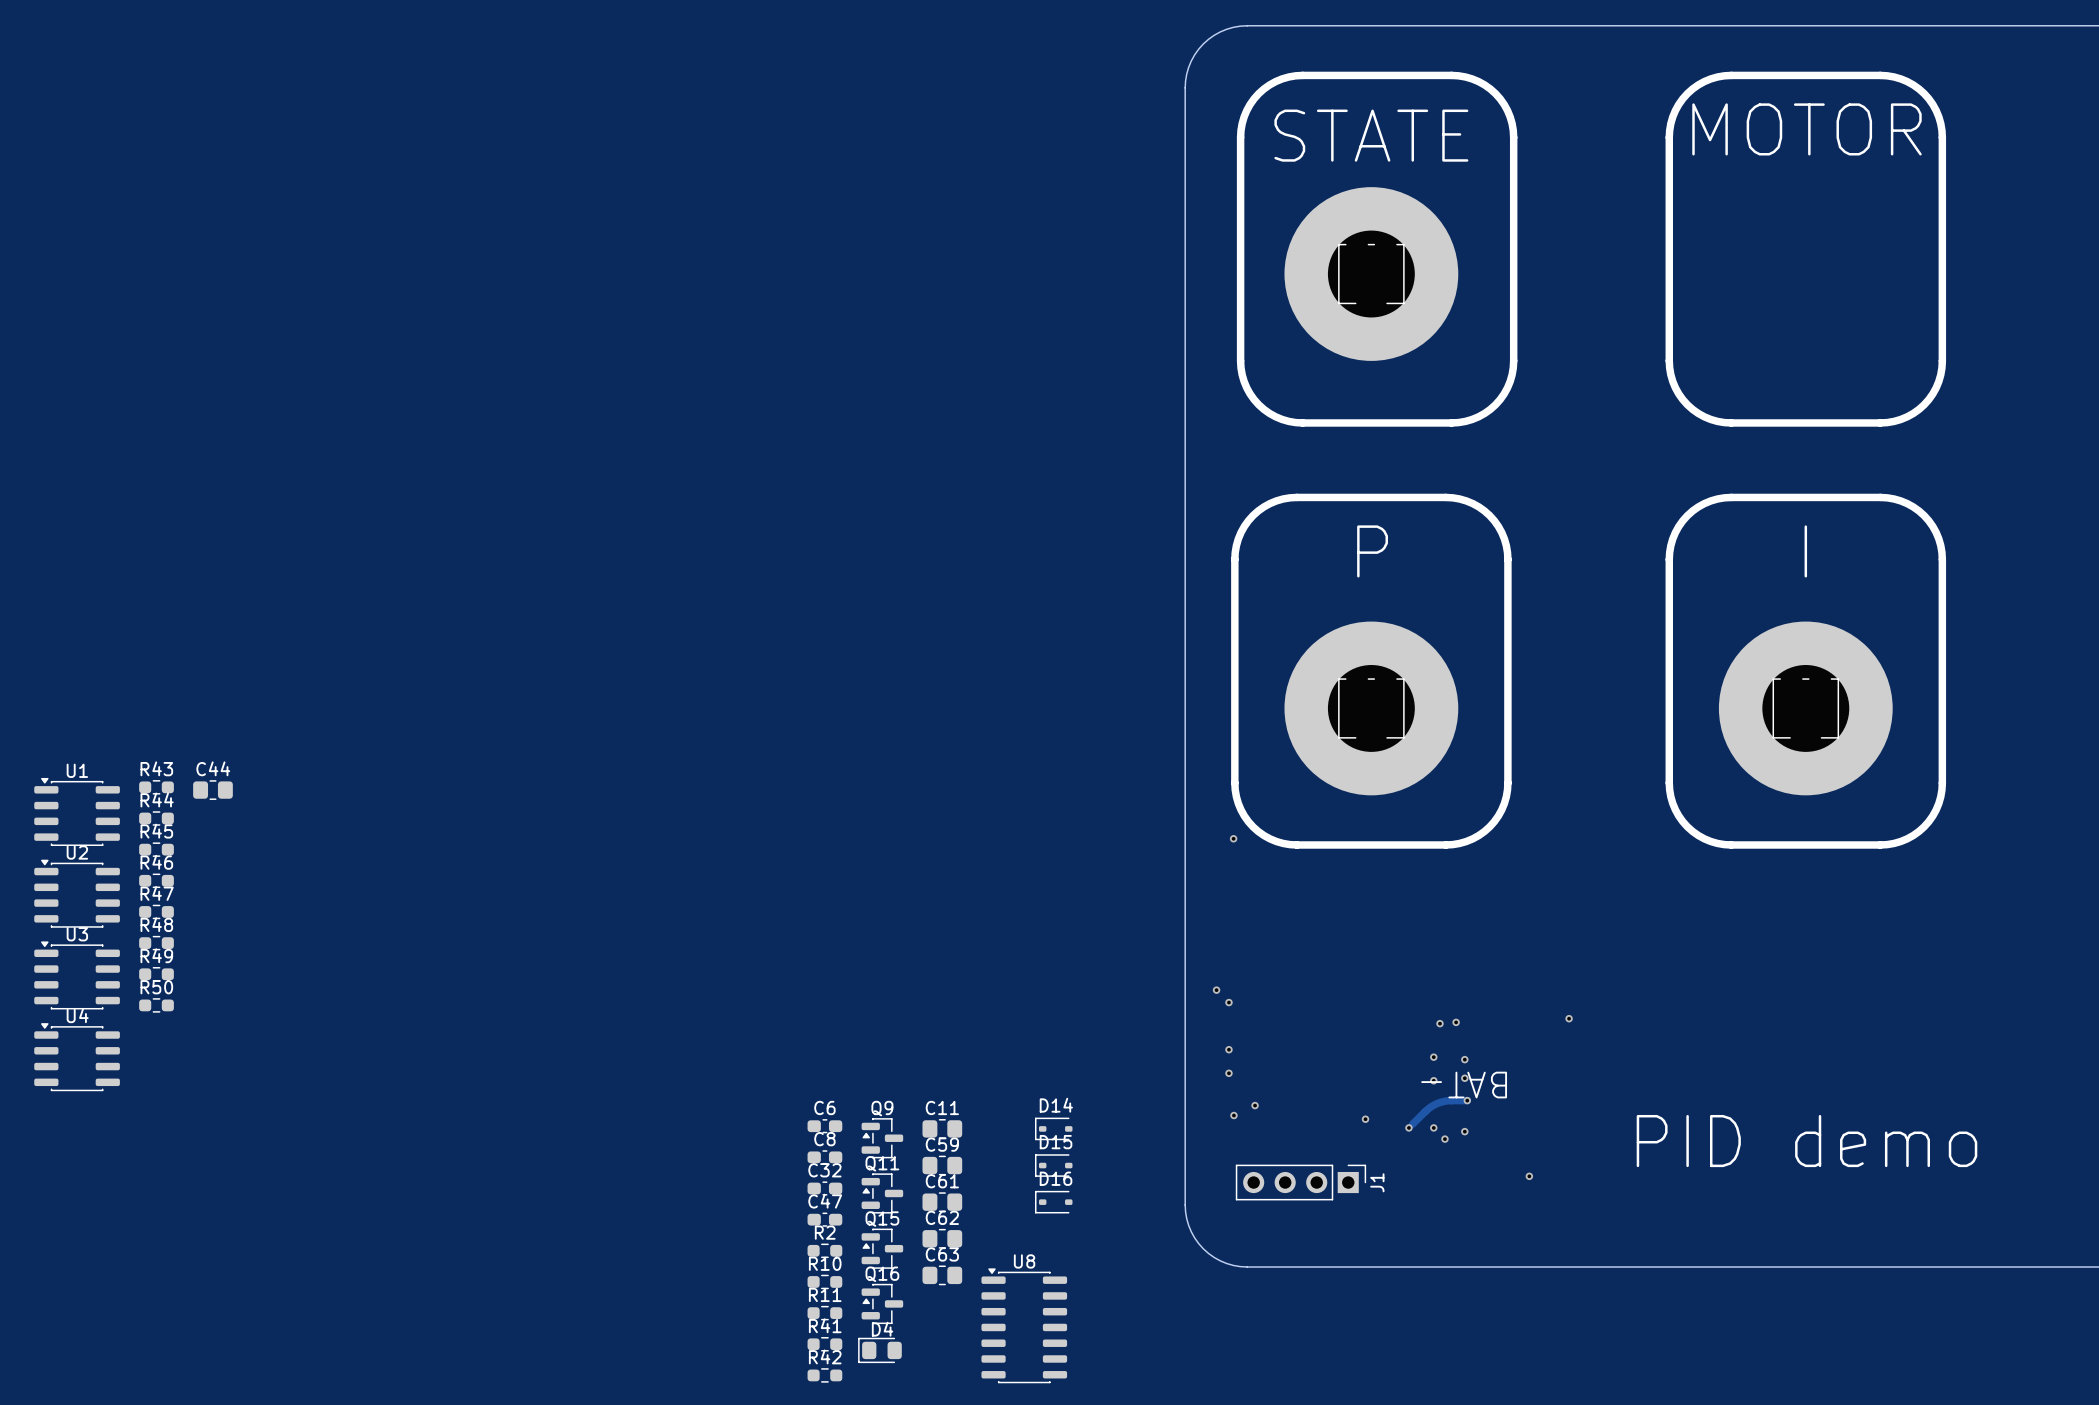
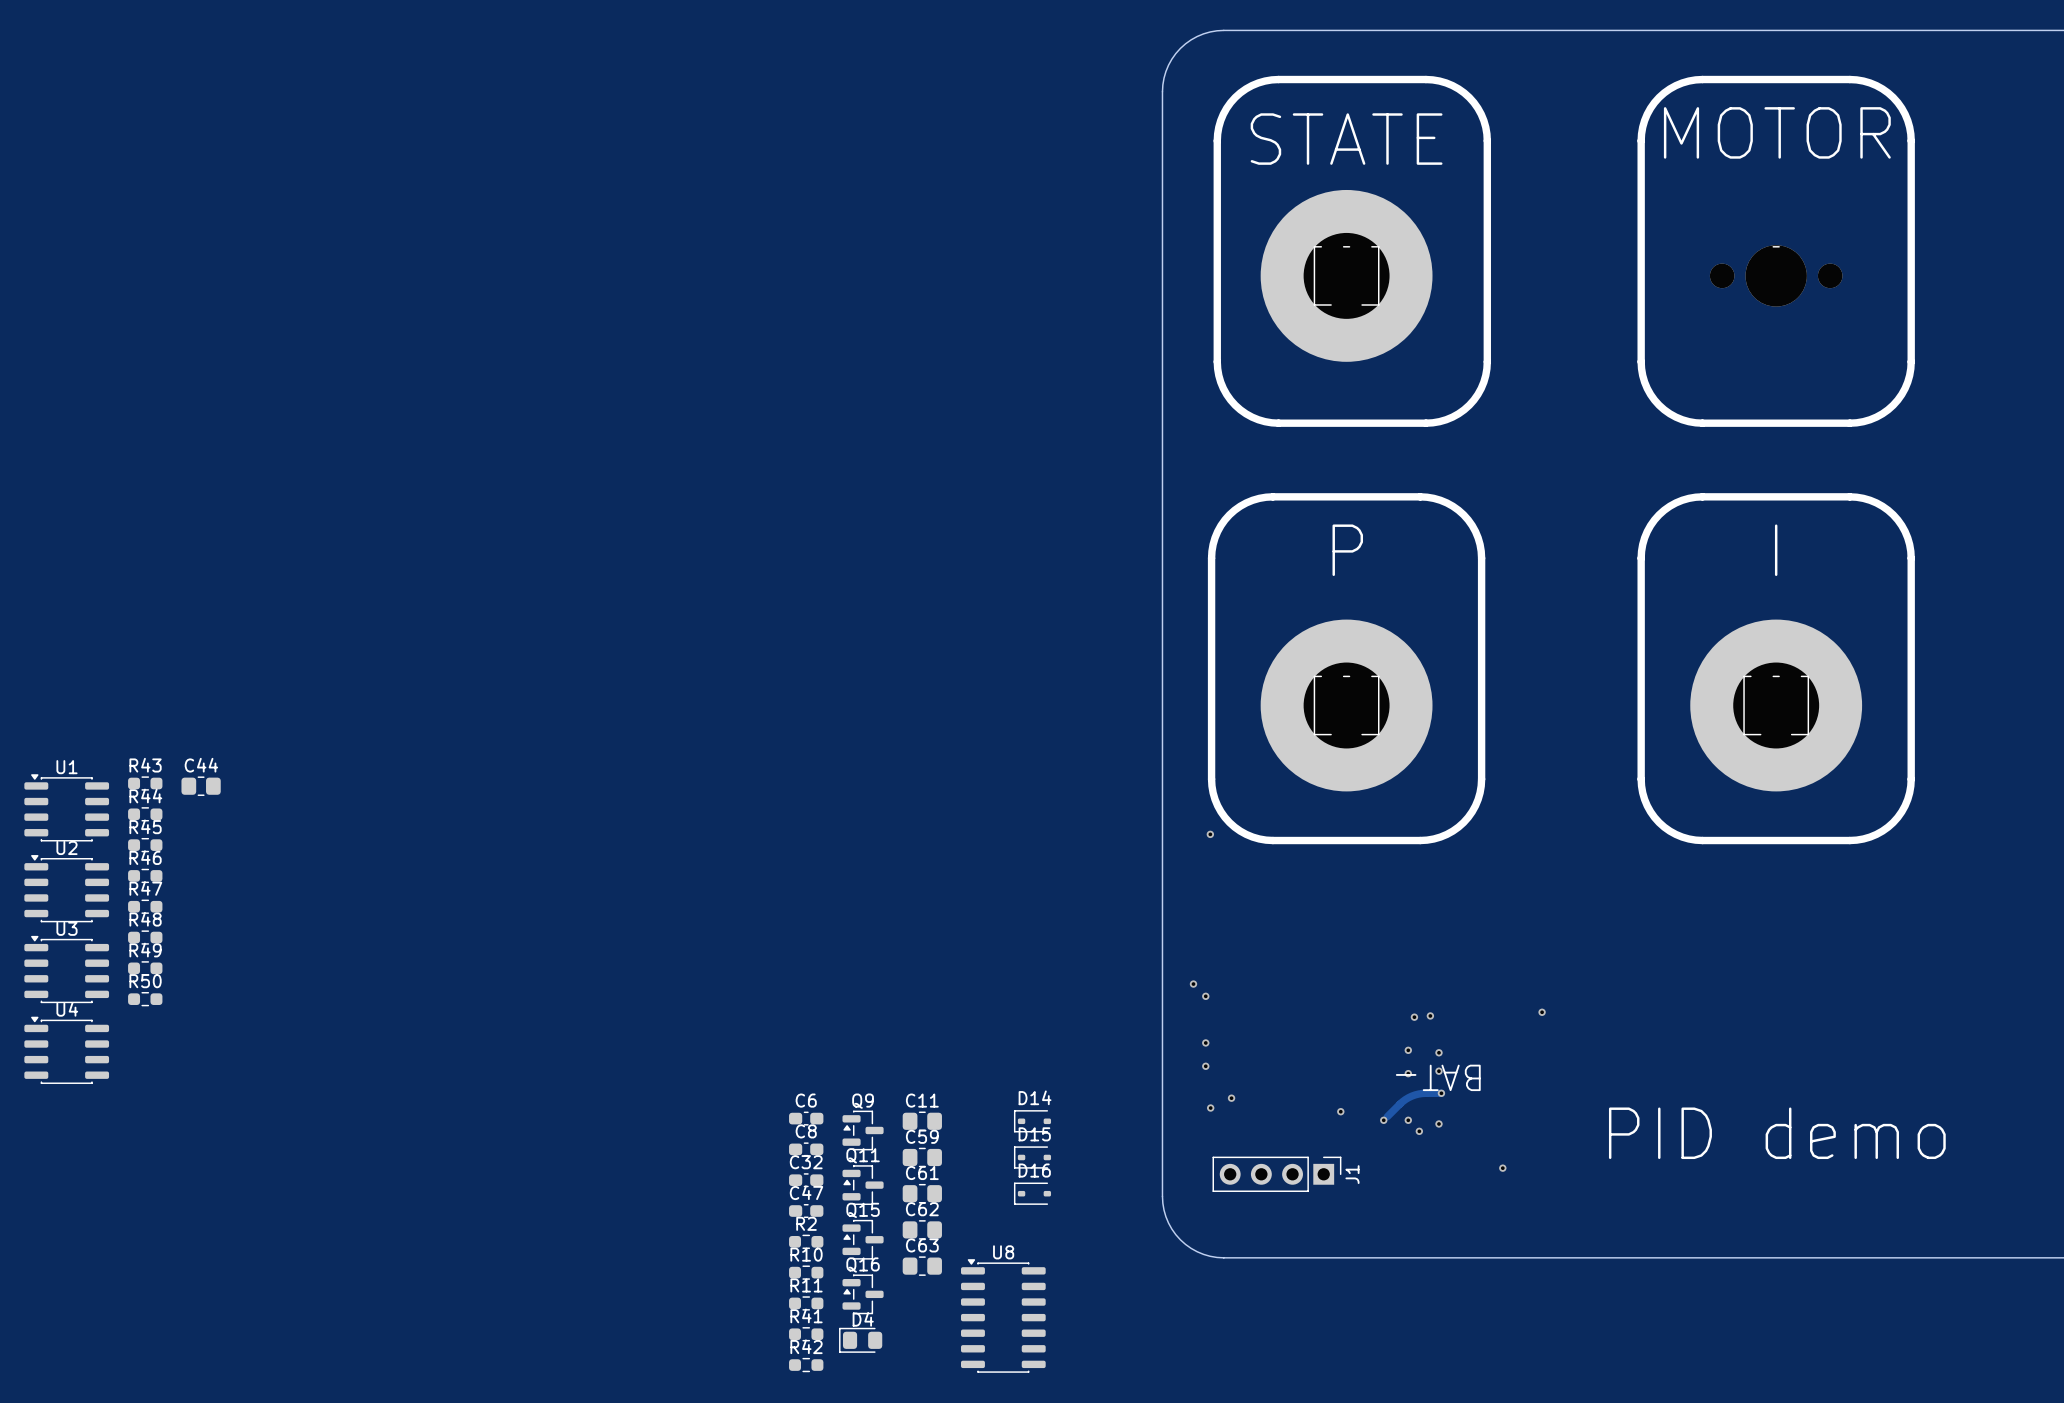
part: none -> (1776, 275)

